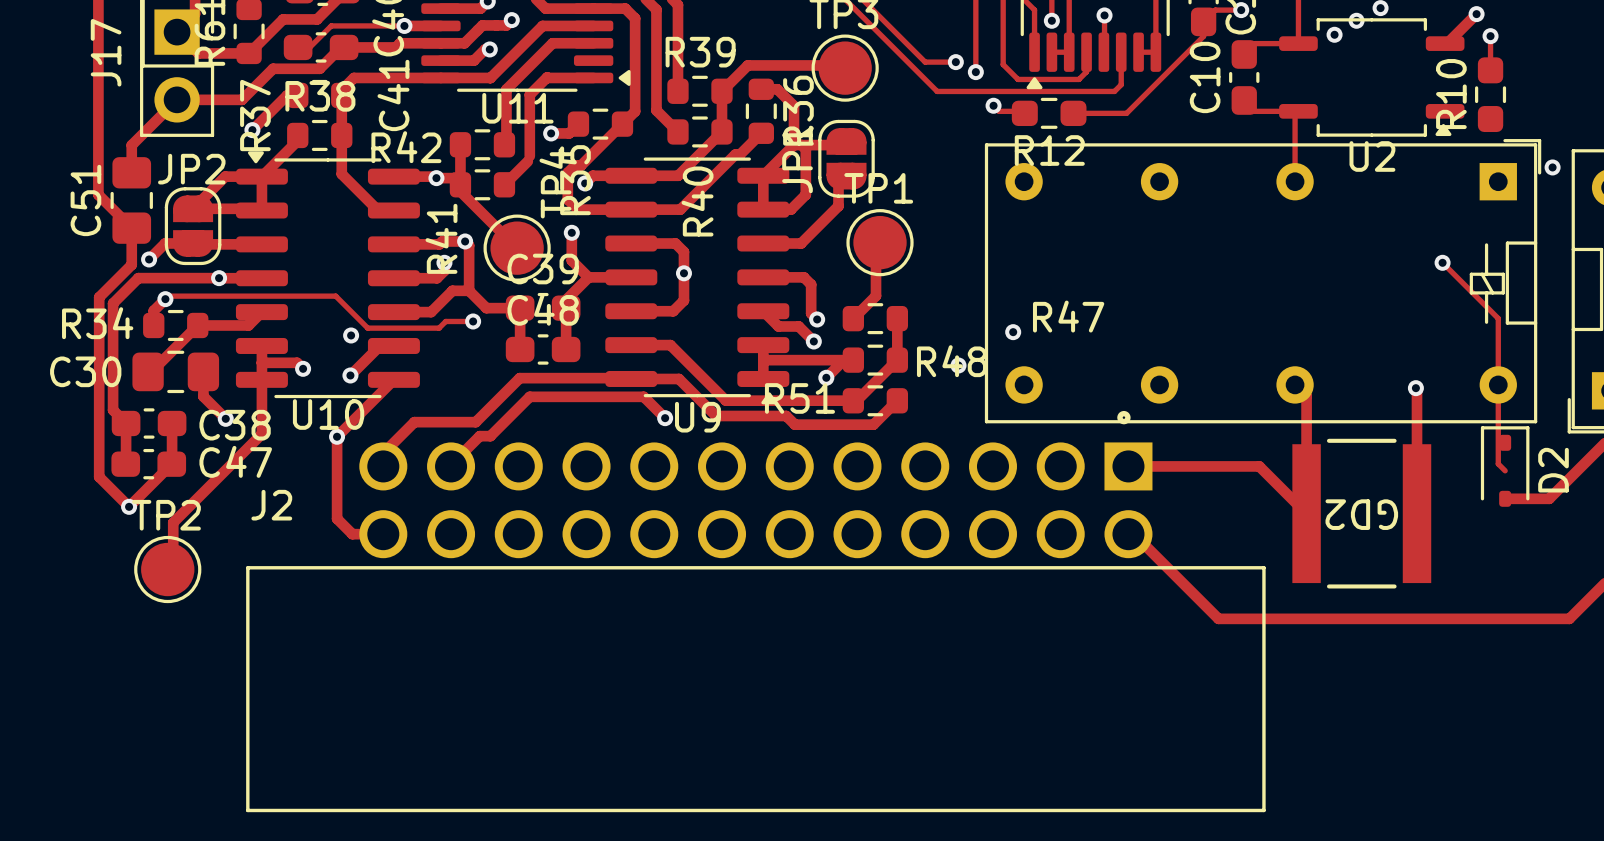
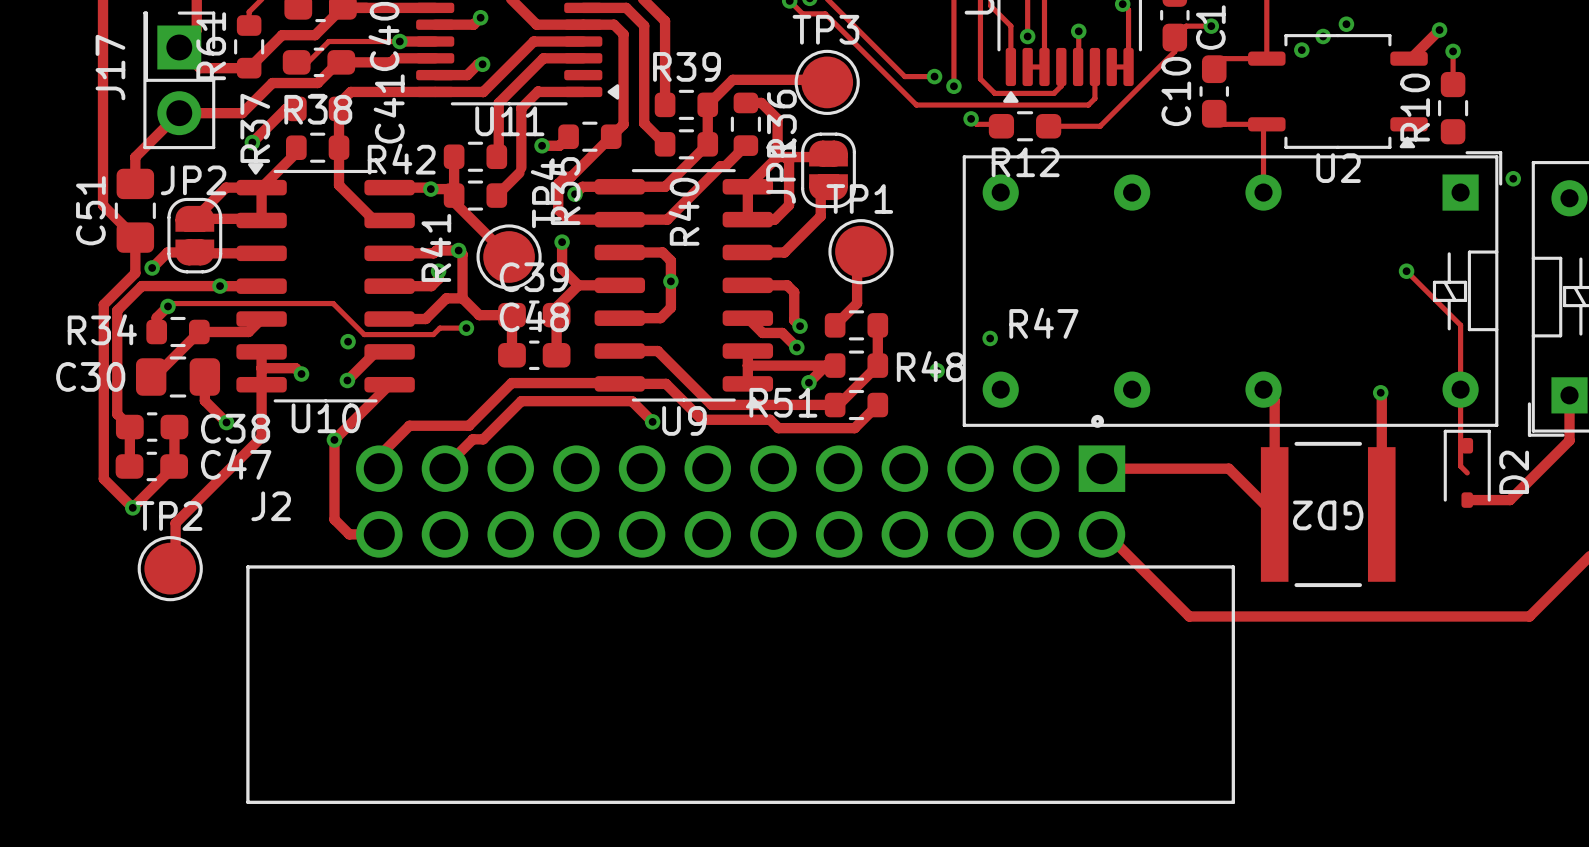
track: (511, 20) (506, 25) (482, 25) (464, 43) (440, 43) -> none
via: (511, 20) -> none

